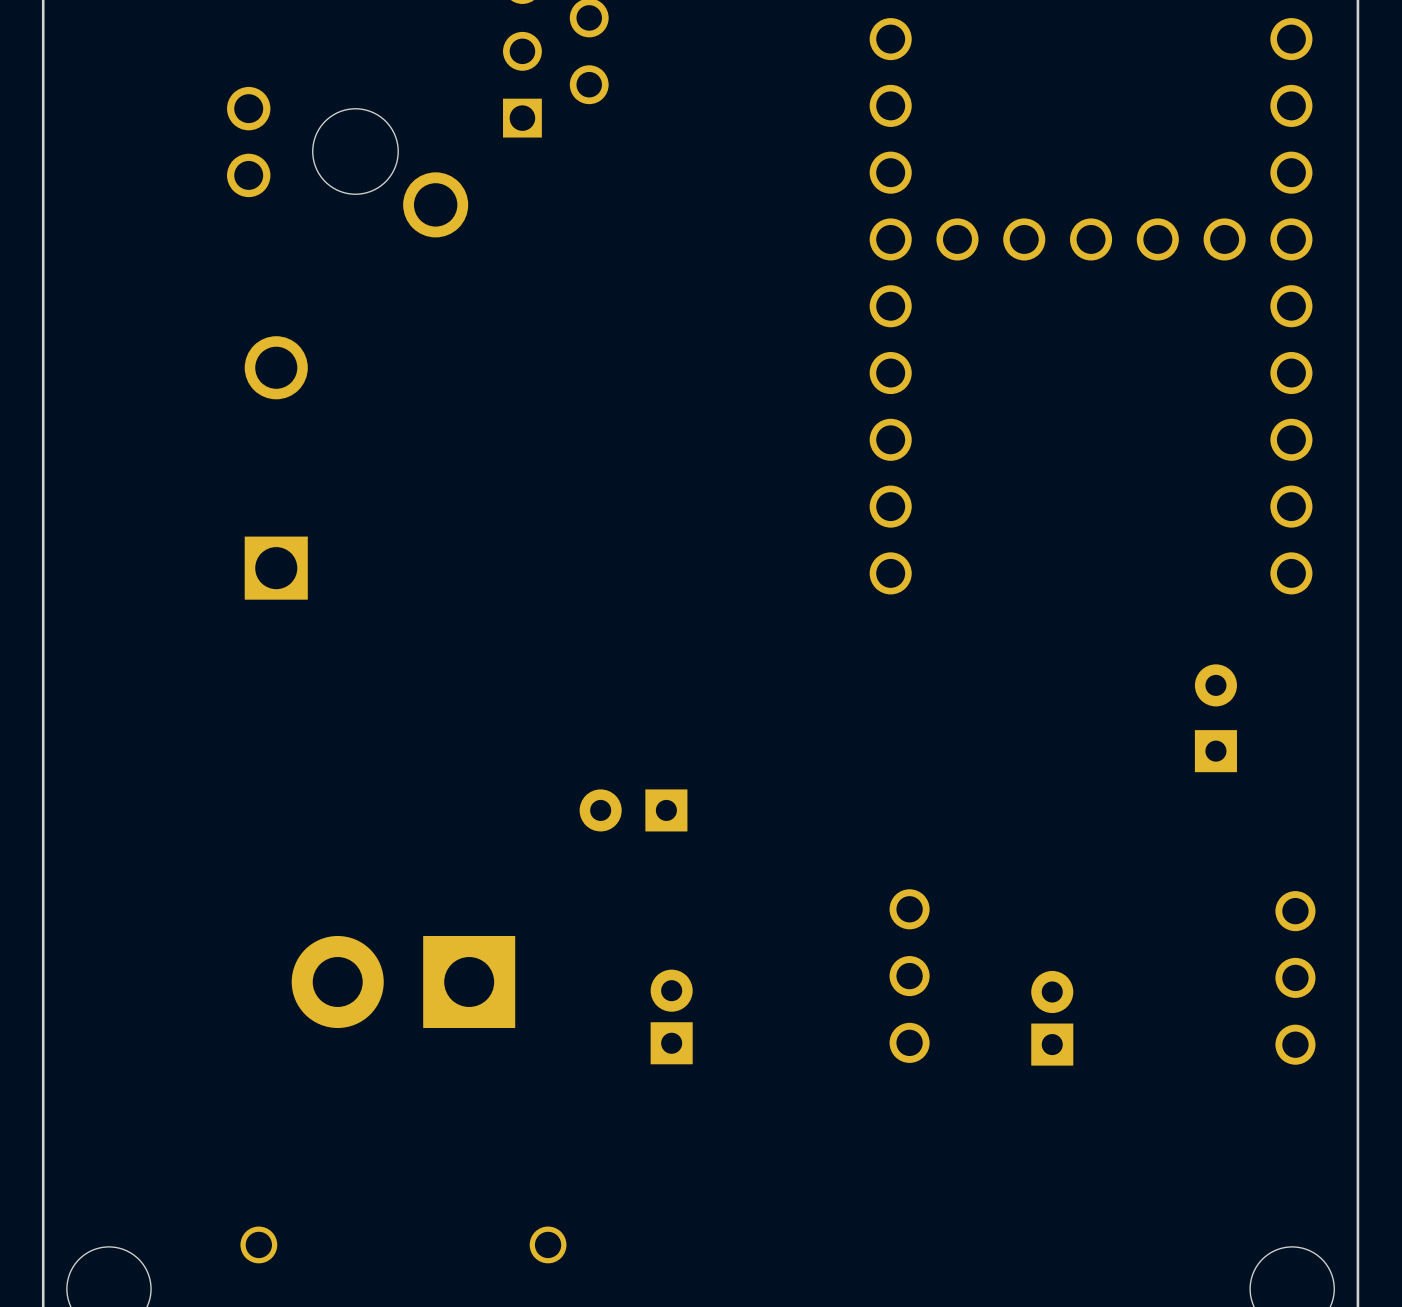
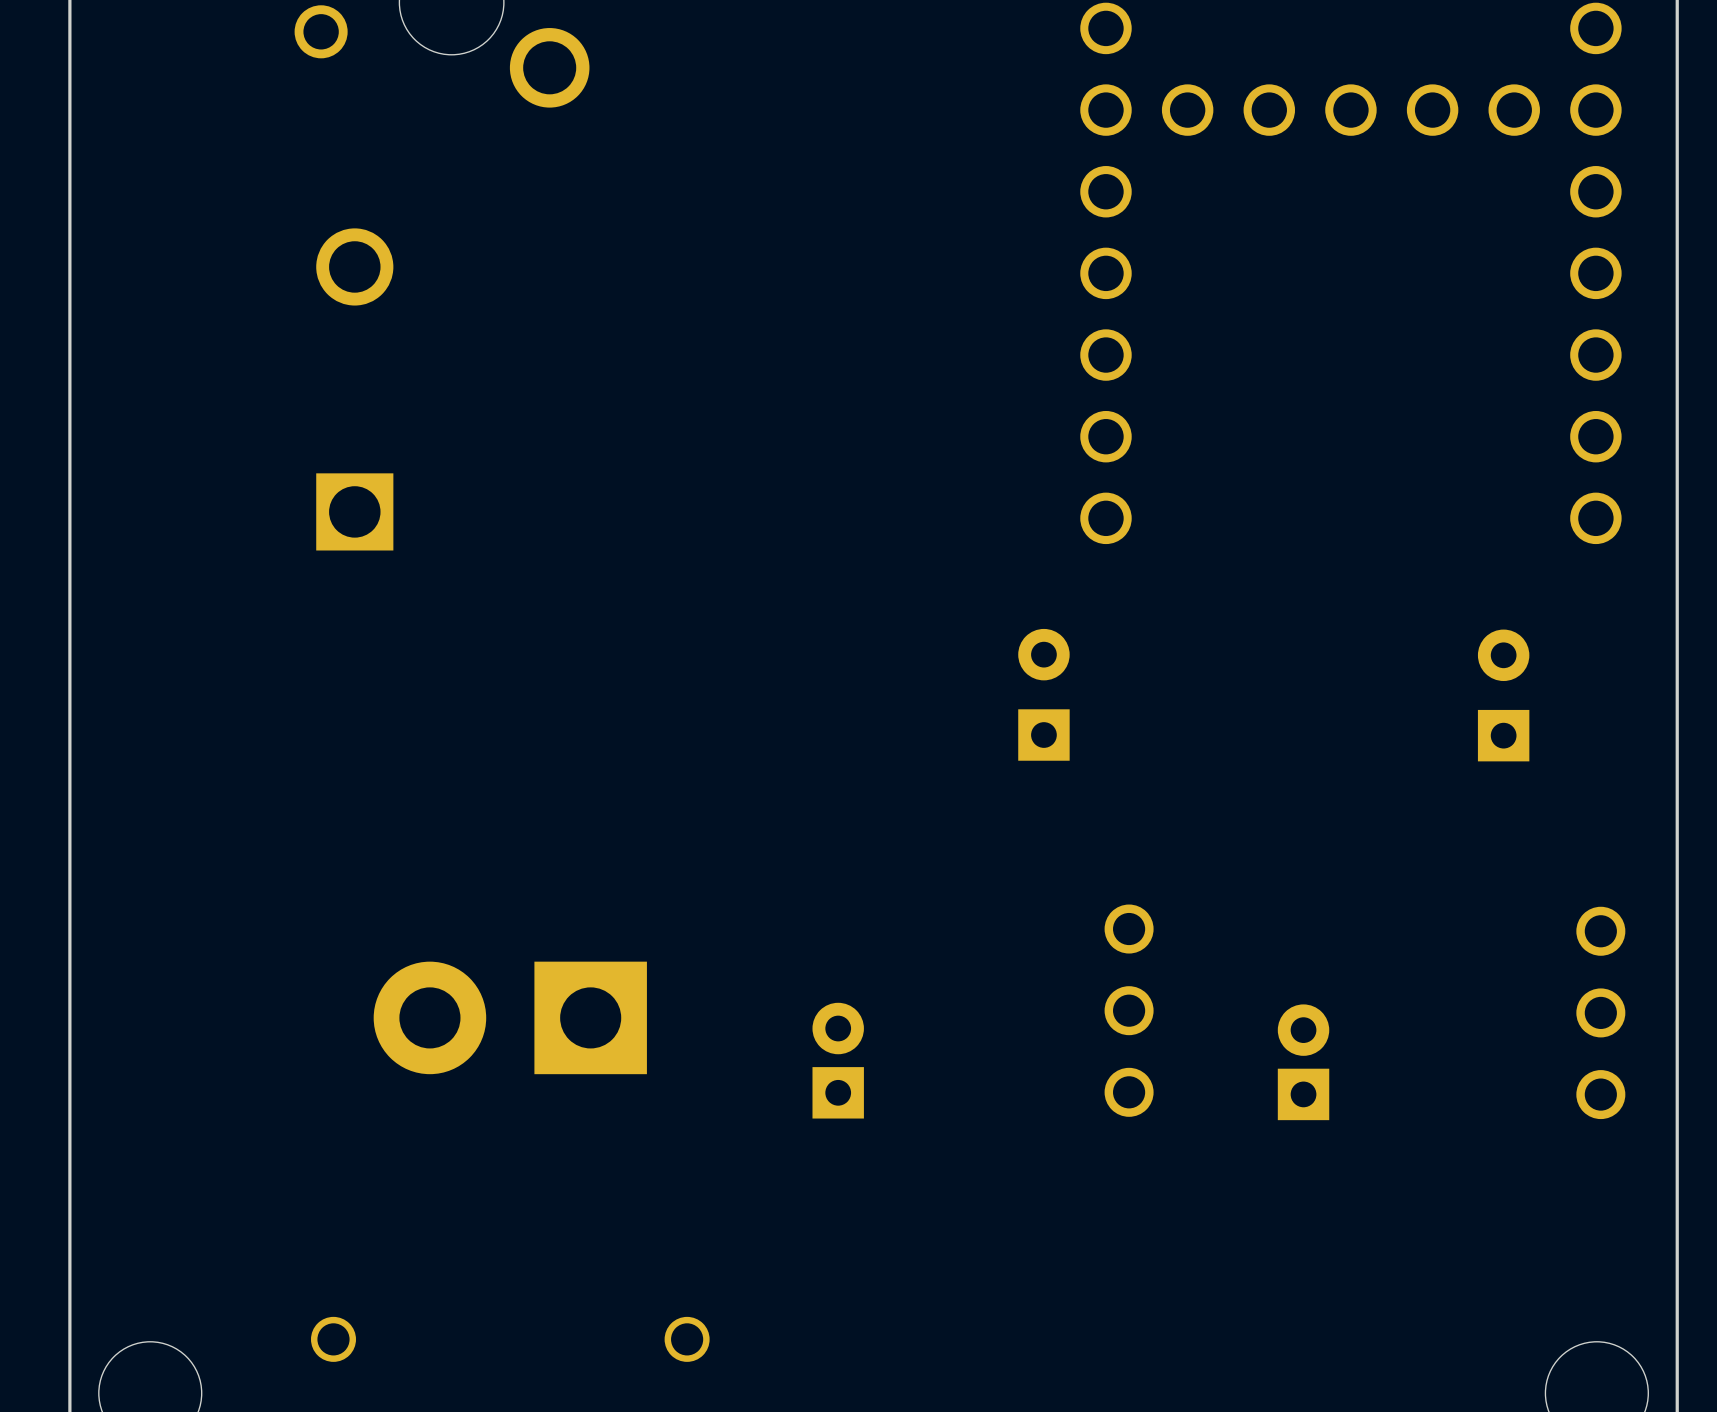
part rotation: 0° (633, 810) -> 90° clockwise (1043, 694)
part position: (633, 810) -> (1043, 694)

